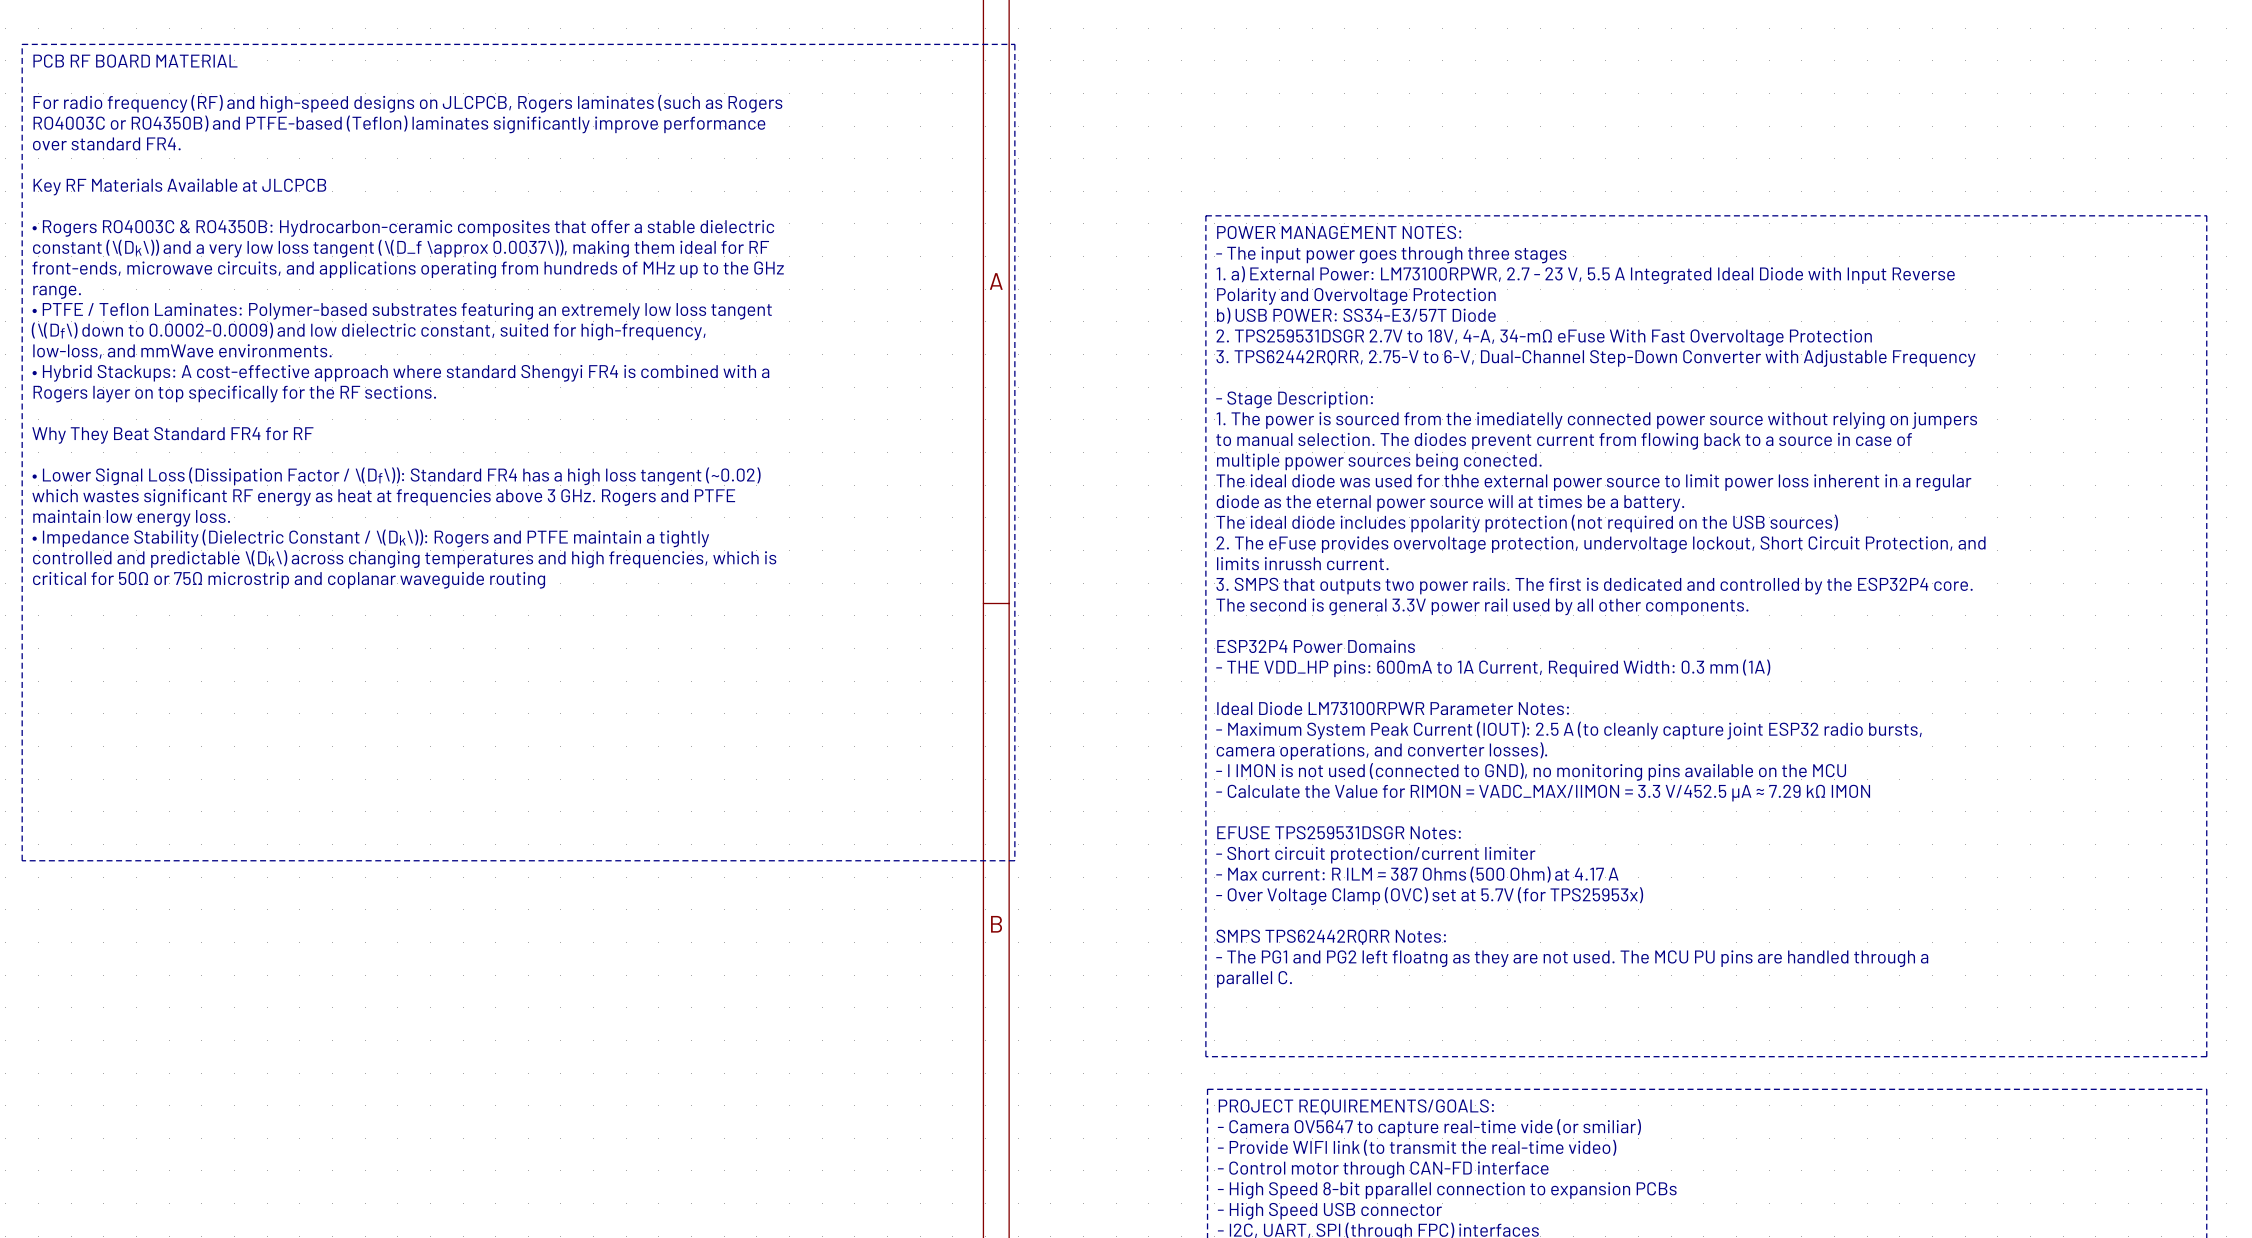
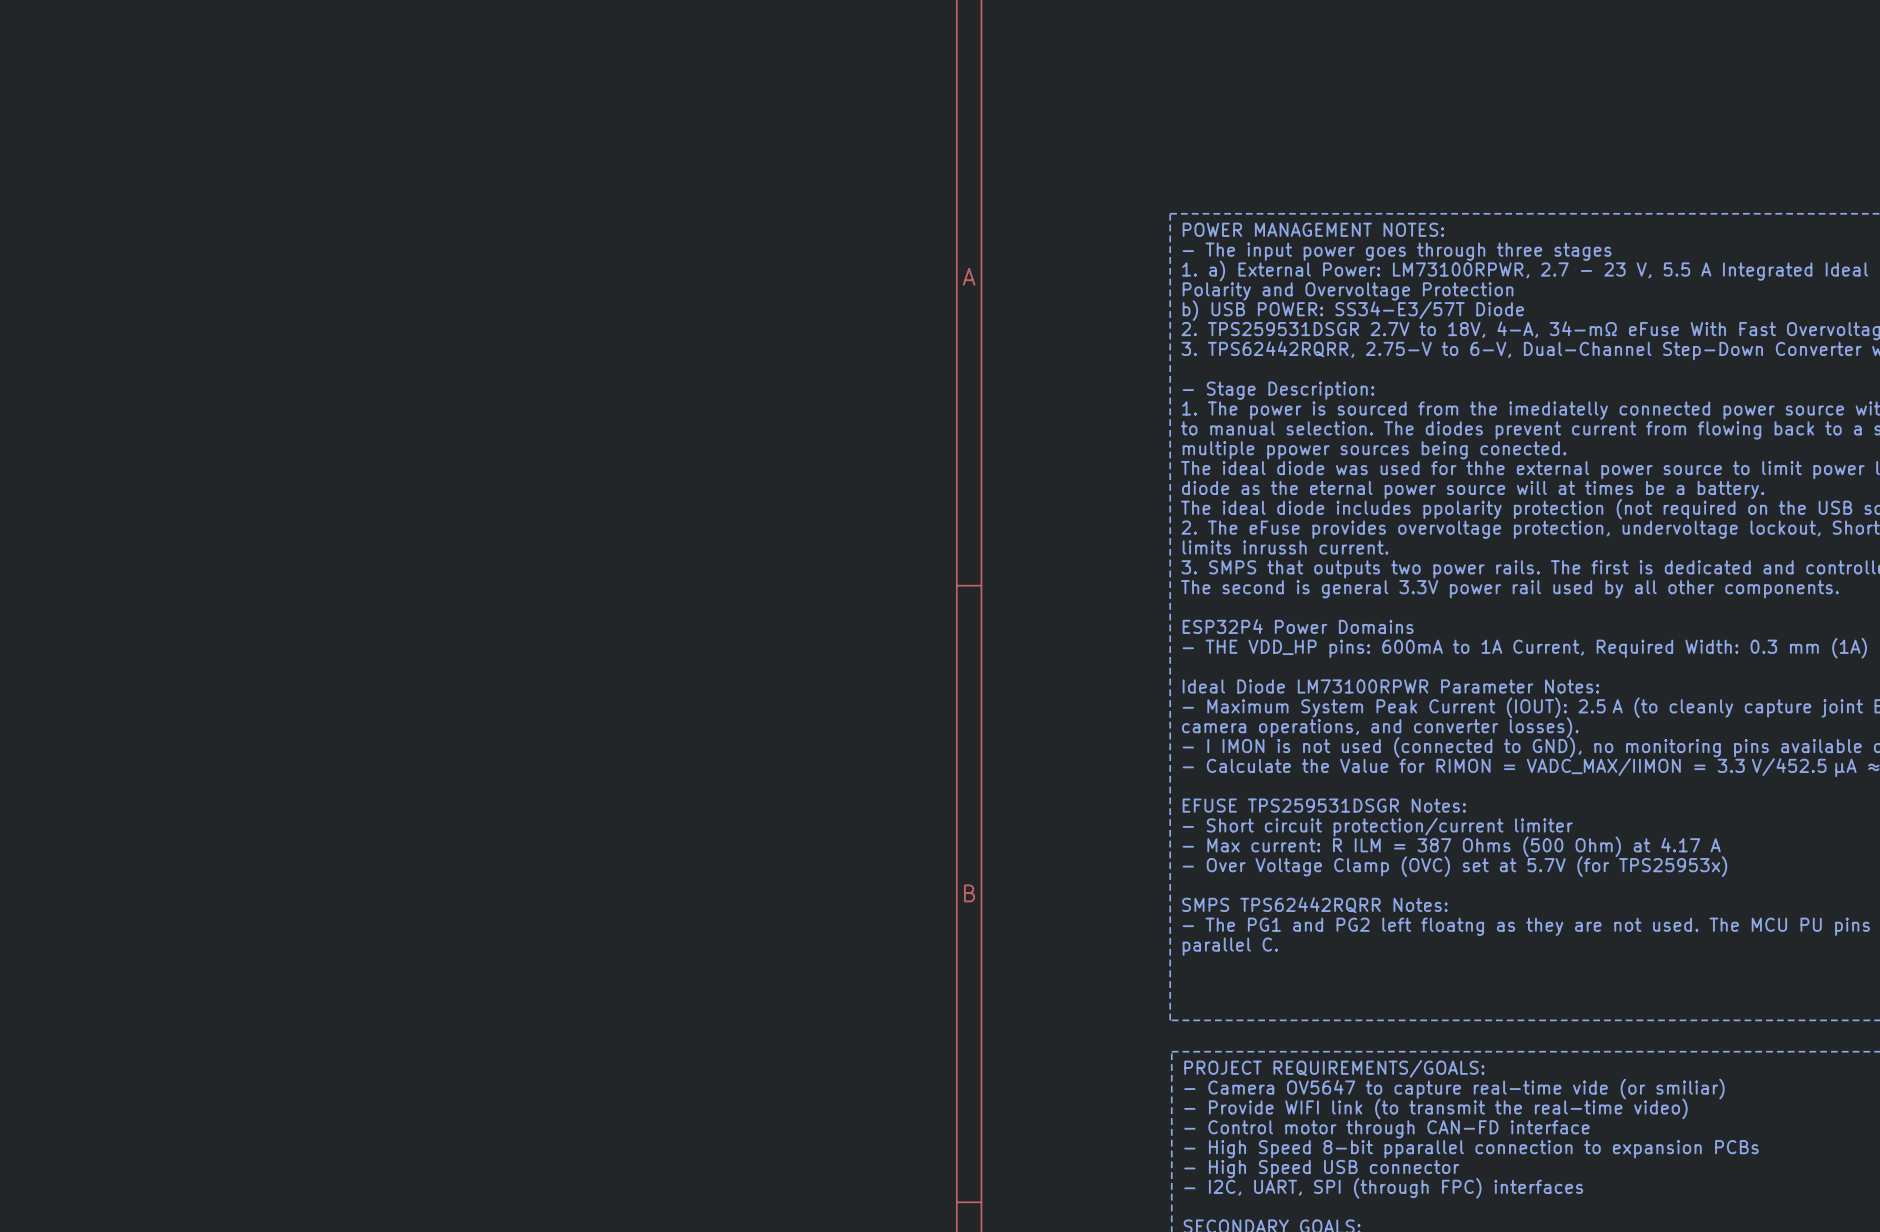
line: (22, 44) (1014, 44) (1014, 860) (22, 860) (22, 44) -> none
text: PCB RF BOARD MATERIAL (135, 61) -> none
text: For radio frequency (RF) and high-speed designs on JLCPCB, Rogers laminates (such as Rogers (407, 103) -> none
text: RO4003C or RO4350B) and PTFE-based (Teflon) laminates significantly improve performance (399, 124) -> none
text: over standard FR4. (106, 143) -> none
text: Key RF Materials Available at JLCPCB (179, 187) -> none
text: • Rogers RO4003C & RO4350B: Hydrocarbon-ceramic composites that offer a stable dielectric (403, 228) -> none
text: constant (\(Dk\)) and a very low loss tangent (\(D_f \approx 0.0037\)), making them ideal for RF (401, 248) -> none
text: front-ends, microwave circuits, and applications operating from hundreds of MHz up to the GHz (408, 269) -> none
text: range. (57, 292) -> none
text: • PTFE / Teflon Laminates: Polymer-based substrates featuring an extremely low loss tangent (402, 311) -> none
text: (\(Df\) down to 0.0002-0.0009) and low dielectric constant, suited for high-frequency, (368, 331) -> none
text: low-loss, and mmWave environments. (182, 351) -> none
text: • Hybrid Stackups: A cost-effective approach where standard Shengyi FR4 is combined with a (400, 373) -> none
text: Rogers layer on top specifically for the RF sections. (234, 393) -> none
text: Why They Beat Standard FR4 for RF (172, 435) -> none
text: • Lower Signal Loss (Dissipation Factor / \(Df\)): Standard FR4 has a high loss tangent (~0.02) (396, 476) -> none
text: which wastes significant RF energy as heat at frequencies above 3 GHz. Rogers and PTFE (383, 497) -> none
text: maintain low energy loss. (131, 518) -> none
text: • Impedance Stability (Dielectric Constant / \(Dk\)): Rogers and PTFE maintain a tightly (370, 538) -> none
text: controlled and predictable \(Dk\) across changing temperatures and high frequencies, which is (404, 559) -> none
text: critical for 50Ω or 75Ω microstrip and coplanar waveguide routing (289, 580) -> none

